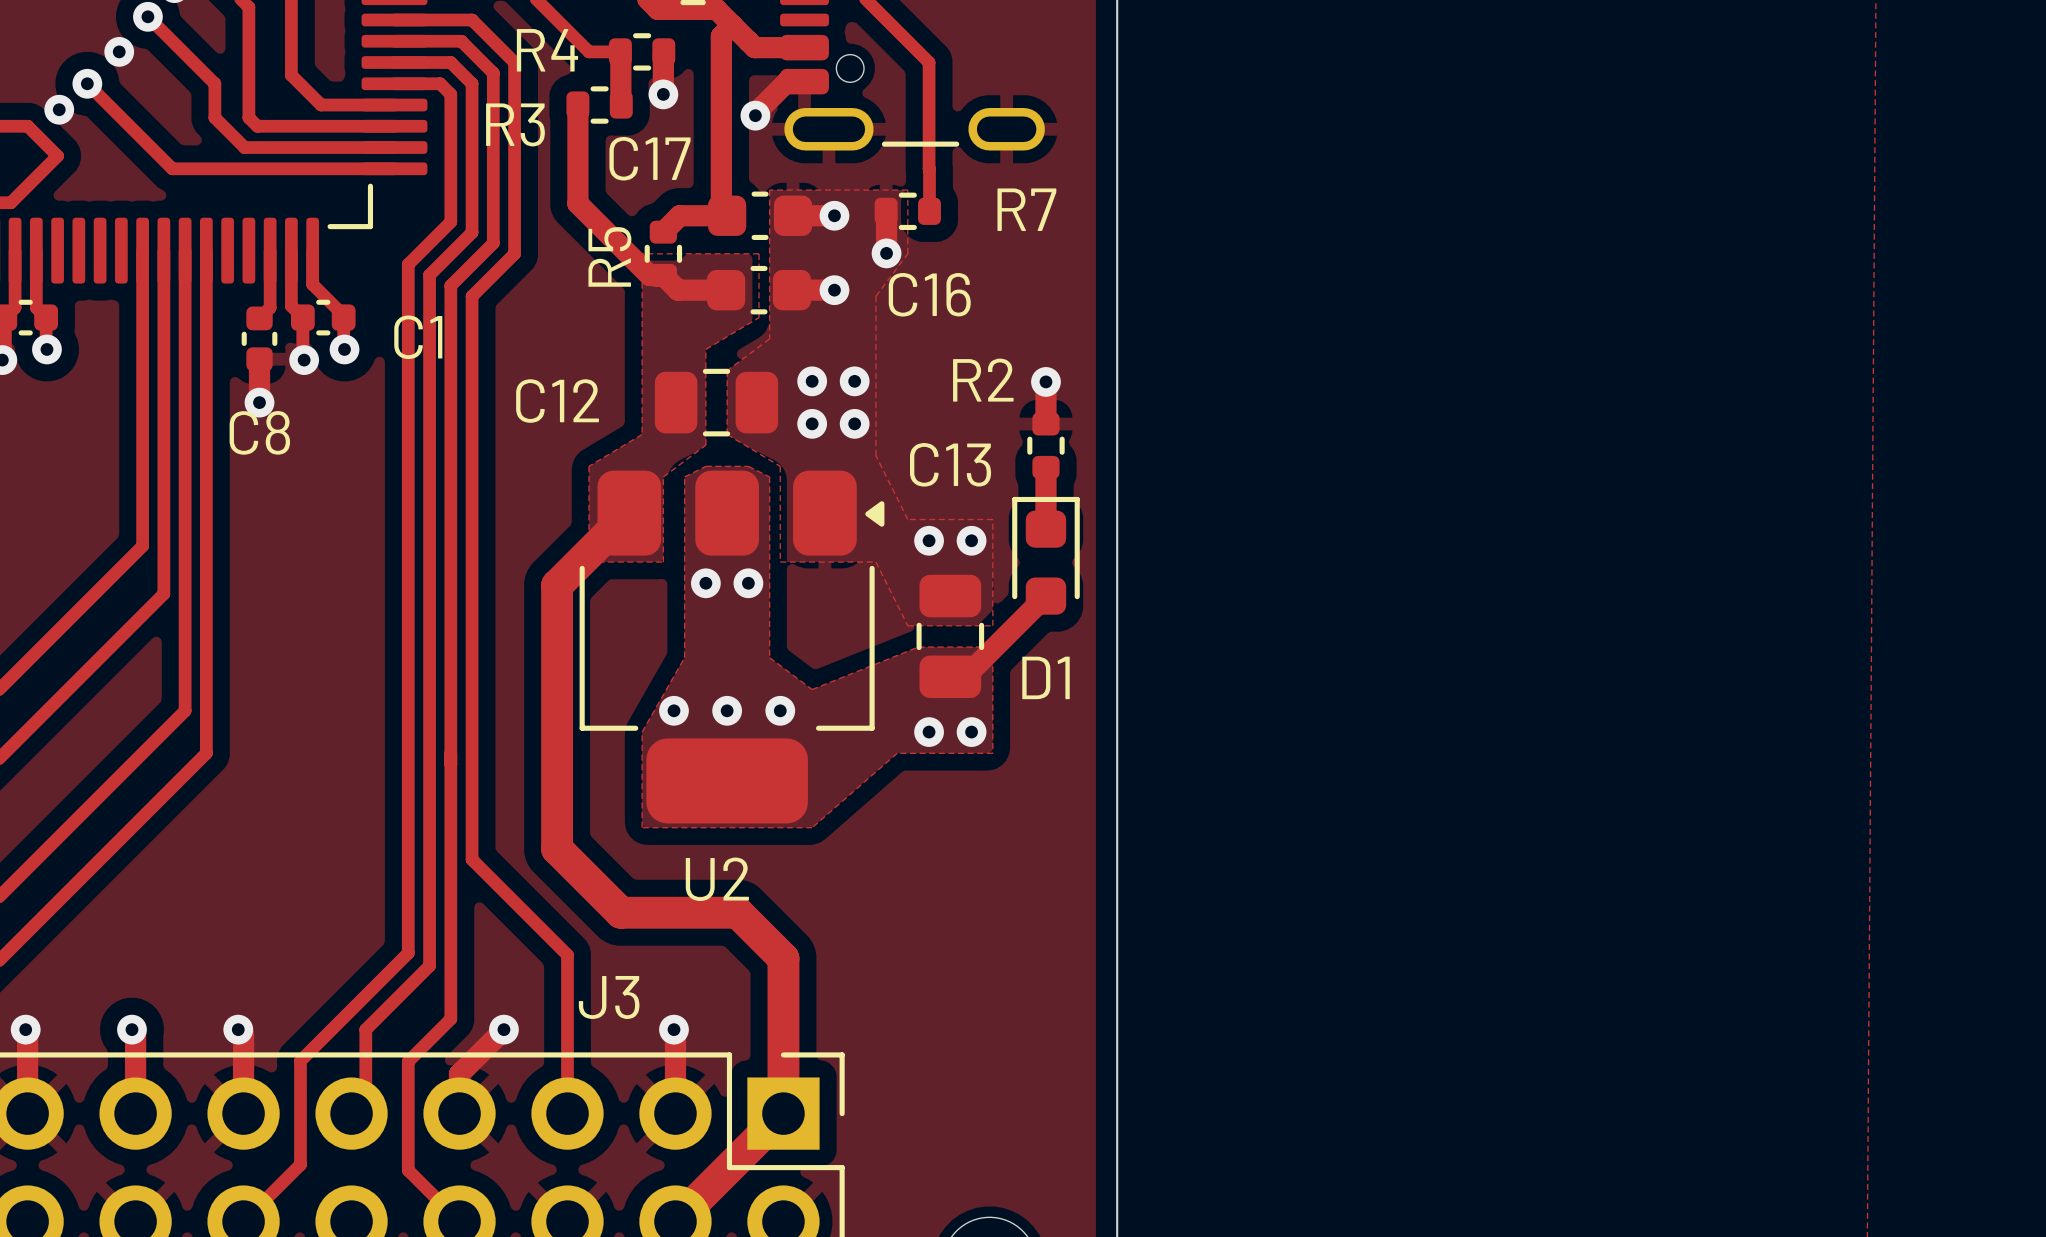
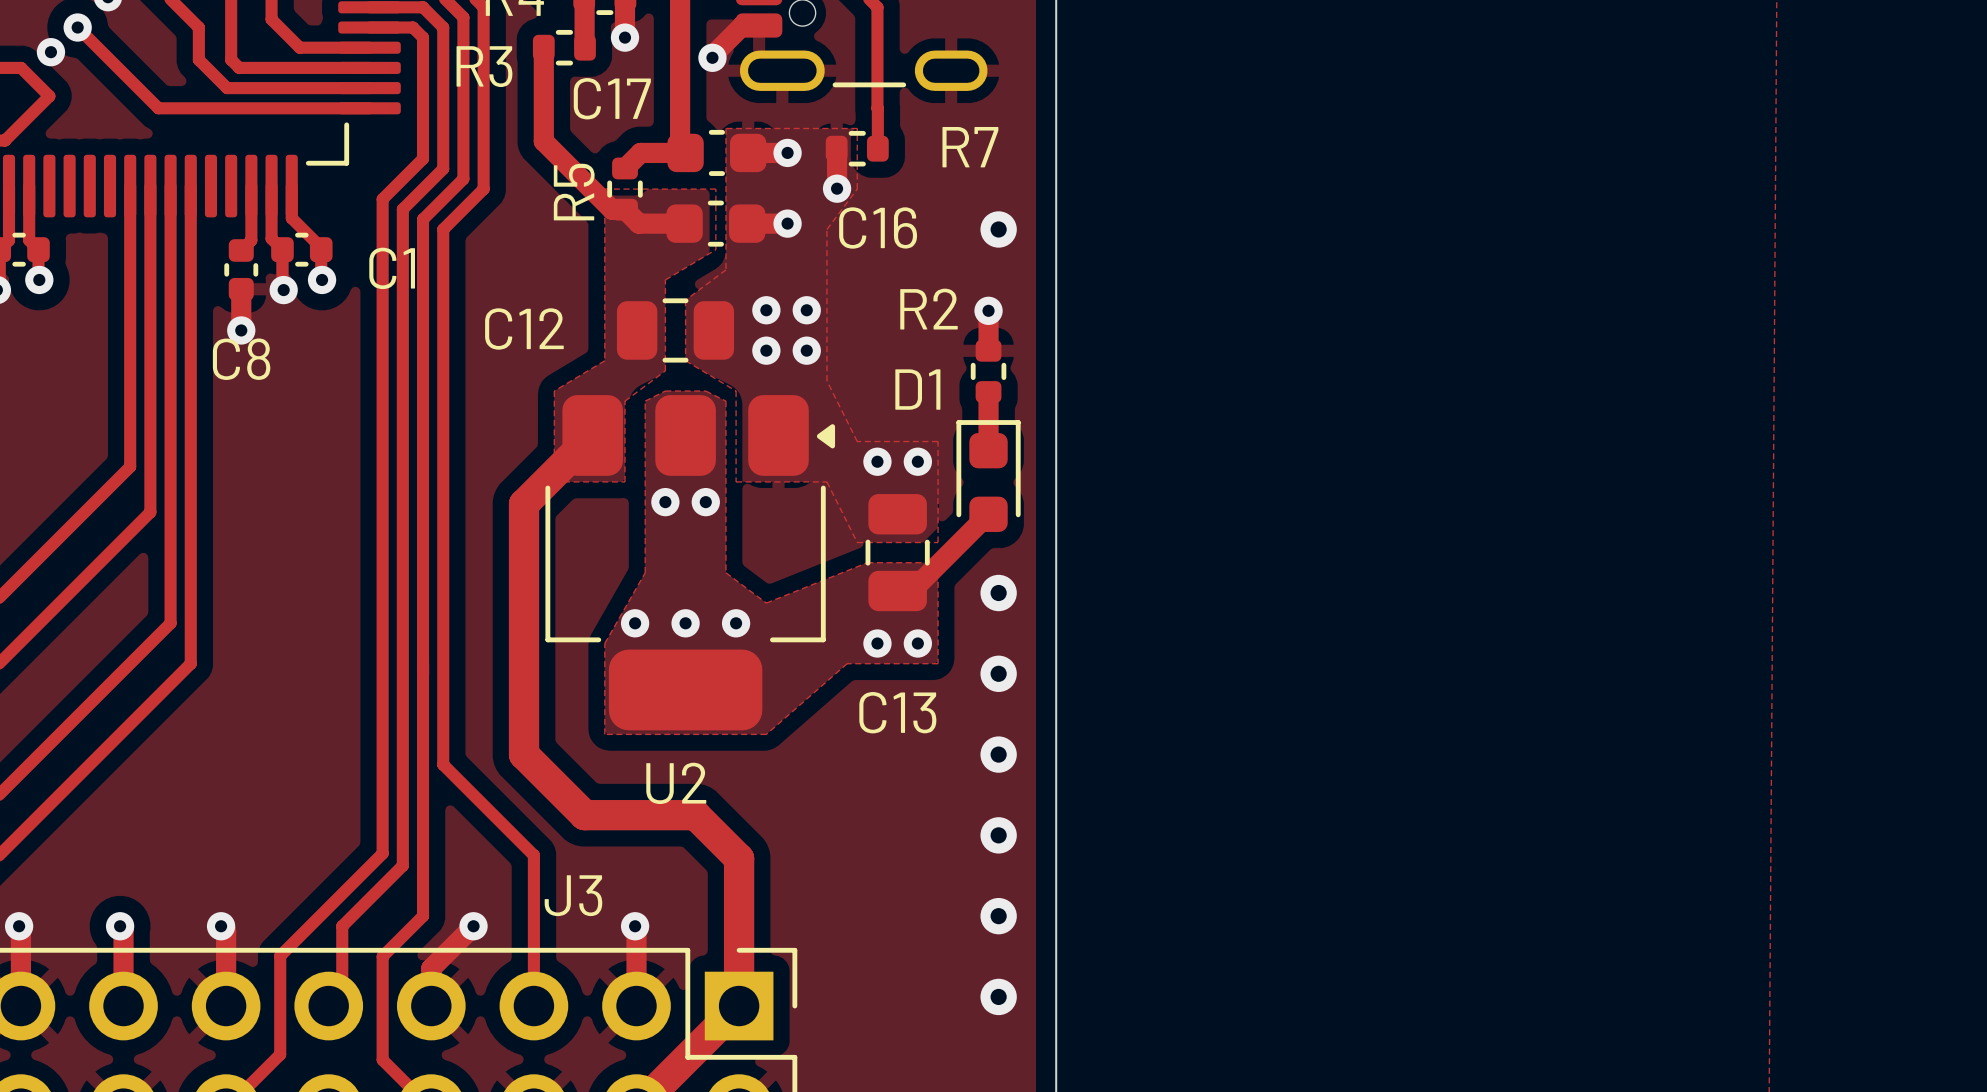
via: none -> (998, 229)
C13 name position: C13 (950, 464) -> C13 (897, 712)
D1 name position: D1 (1046, 677) -> D1 (917, 389)
via: none -> (998, 593)
via: none -> (998, 673)
via: none -> (998, 754)
via: none -> (998, 835)
via: none -> (998, 916)
via: none -> (998, 996)

